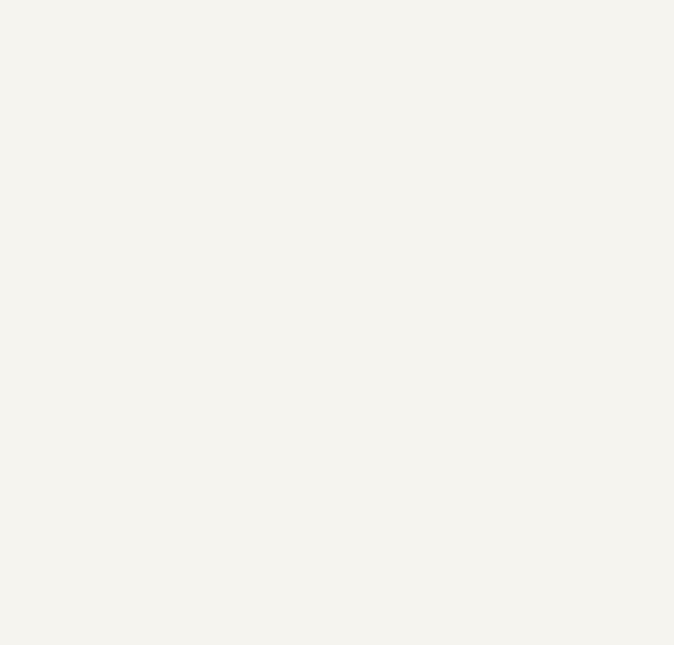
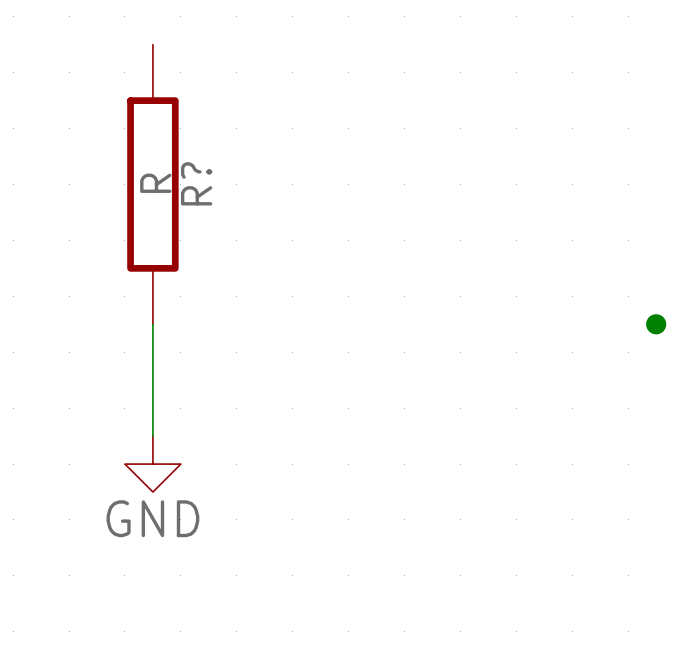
R?: none -> R (152, 184)
wire: none -> (152, 324) (152, 436)
junction: none -> (656, 324)
power symbol: none -> GND (152, 464)

